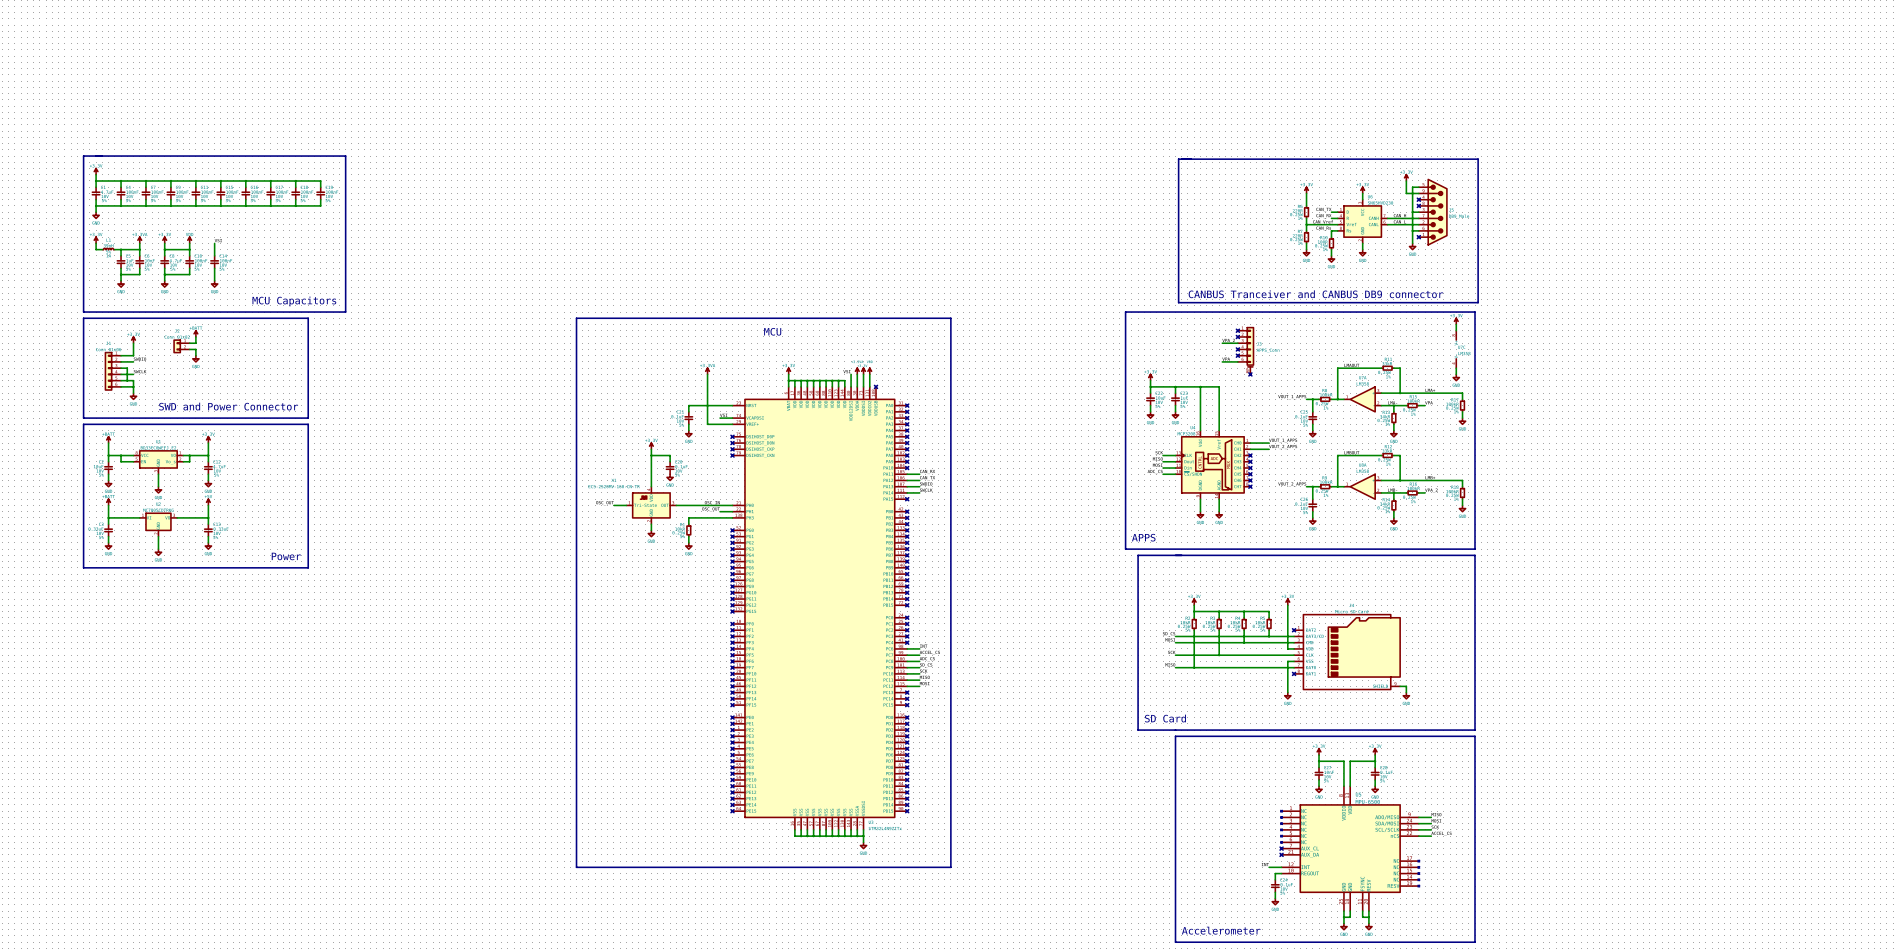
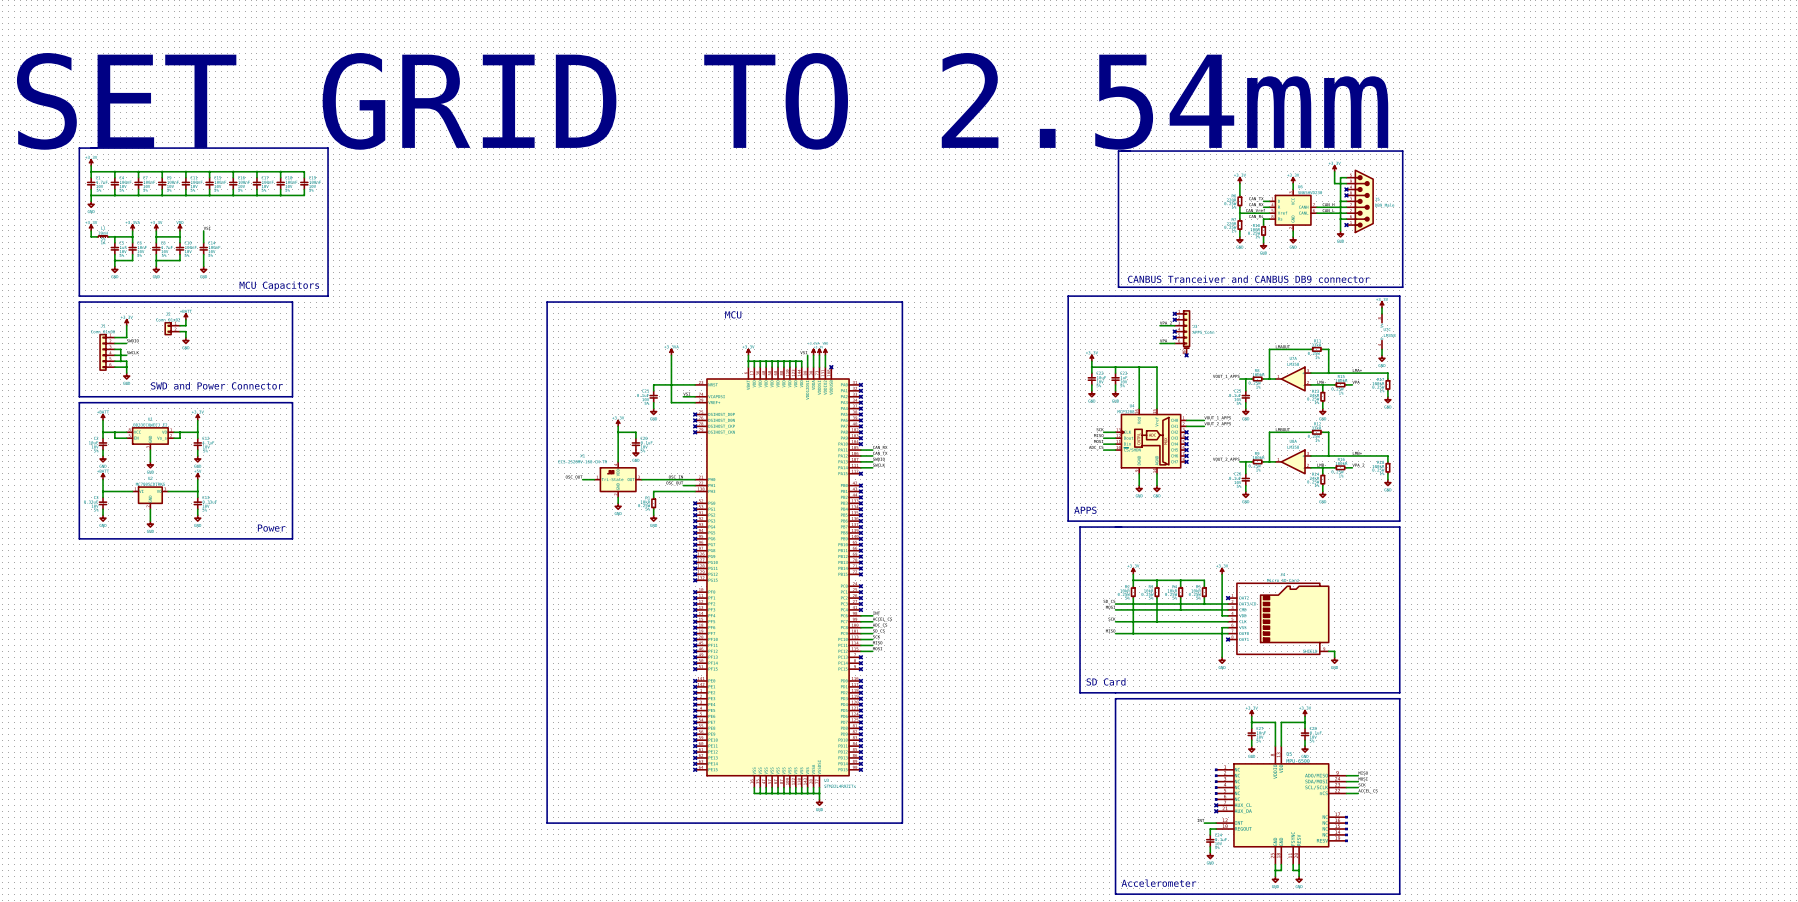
text: none -> SET GRID TO 2.54mm (702, 101)

